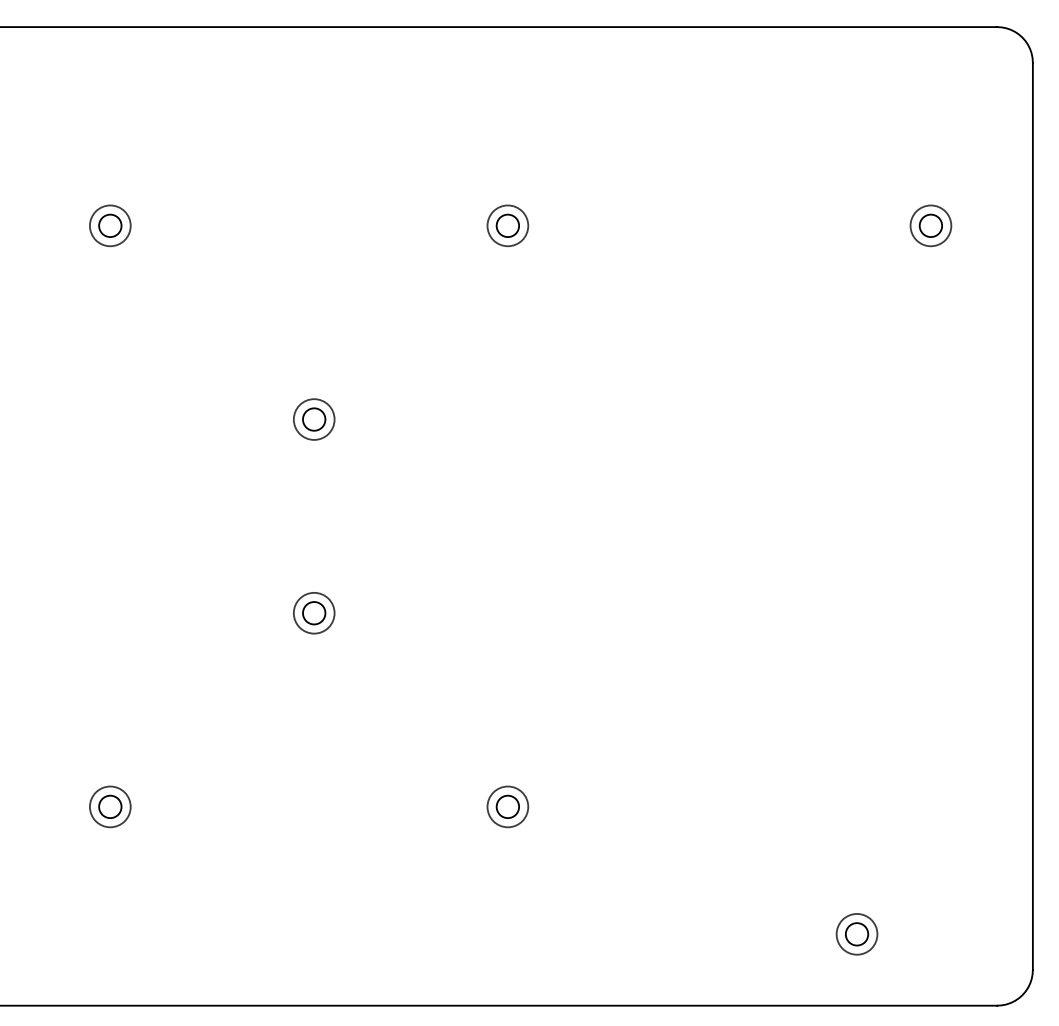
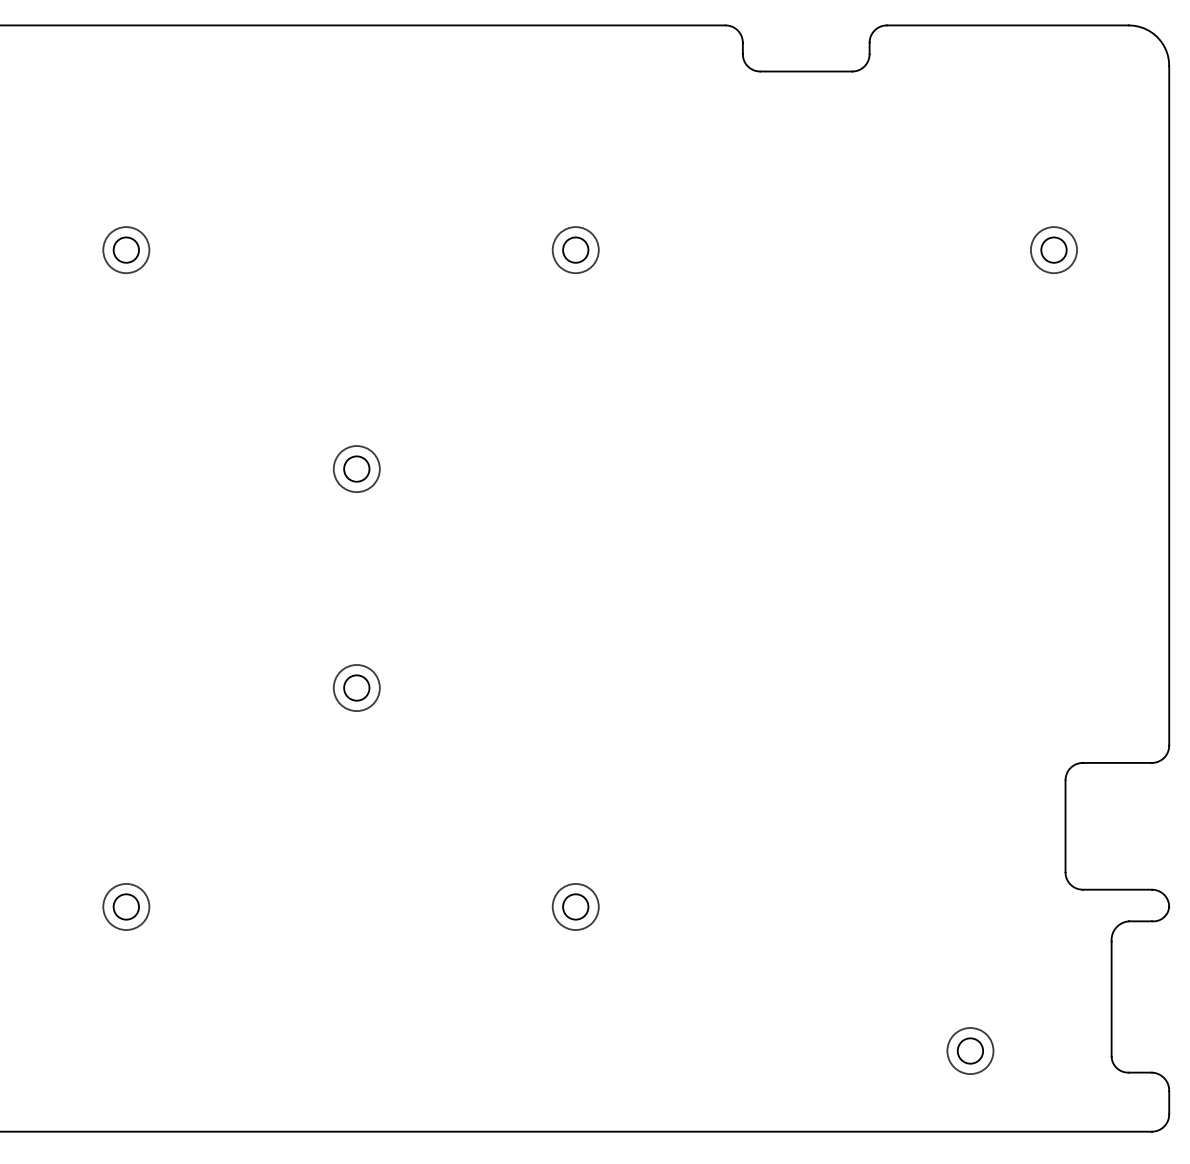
board edge: (640, 27) (783, 27) -> (725, 25) (734, 27) (739, 32) (742, 40) (745, 62) (751, 69) (760, 71) (858, 70) (868, 60) (871, 34) (878, 27) (886, 25)
board edge: (1032, 664) (1032, 974) (1030, 983) (1022, 995) (1010, 1002) (997, 1005) -> (1169, 745) (1165, 756) (1156, 762) (1080, 763) (1070, 768) (1065, 777) (1065, 872) (1069, 882) (1080, 889) (1156, 890) (1164, 894) (1169, 904) (1167, 912) (1161, 918) (1154, 921) (1124, 922) (1116, 927) (1111, 936) (1112, 1061) (1116, 1068) (1124, 1072) (1158, 1074) (1165, 1080) (1169, 1089) (1169, 1116) (1164, 1126) (1154, 1131) (1128, 1131)

